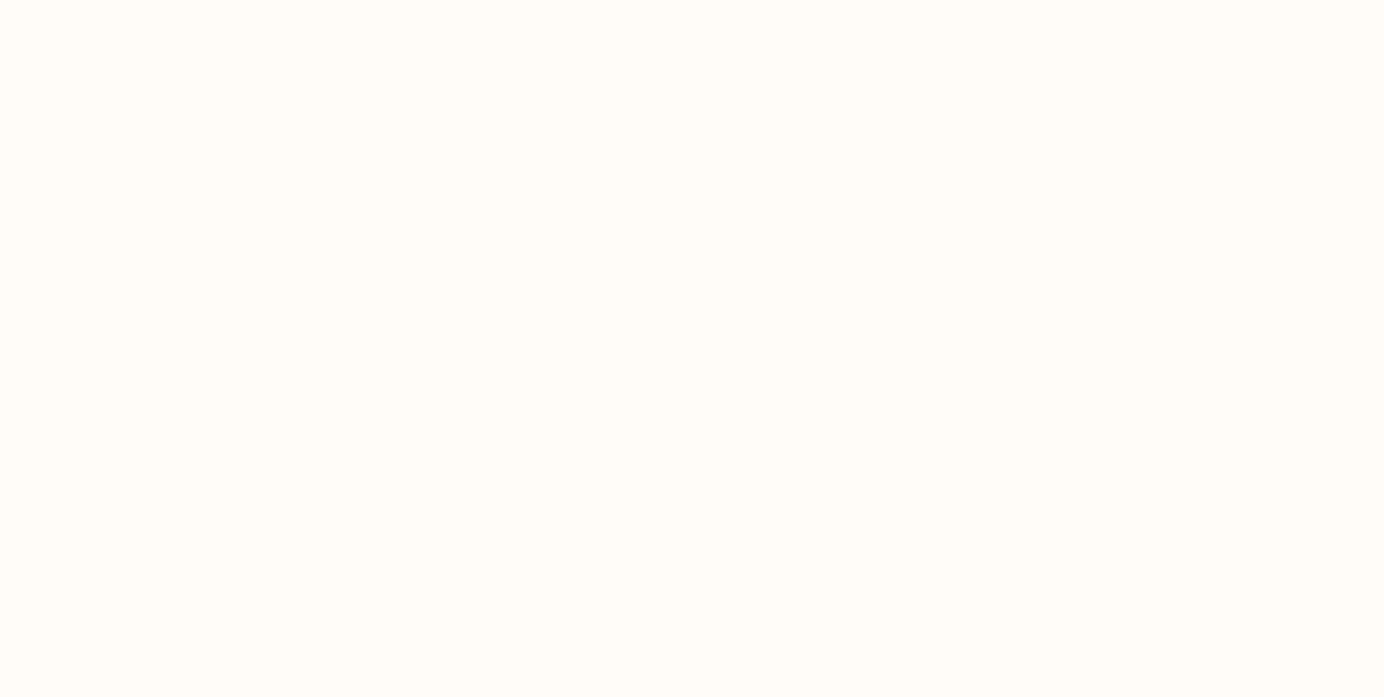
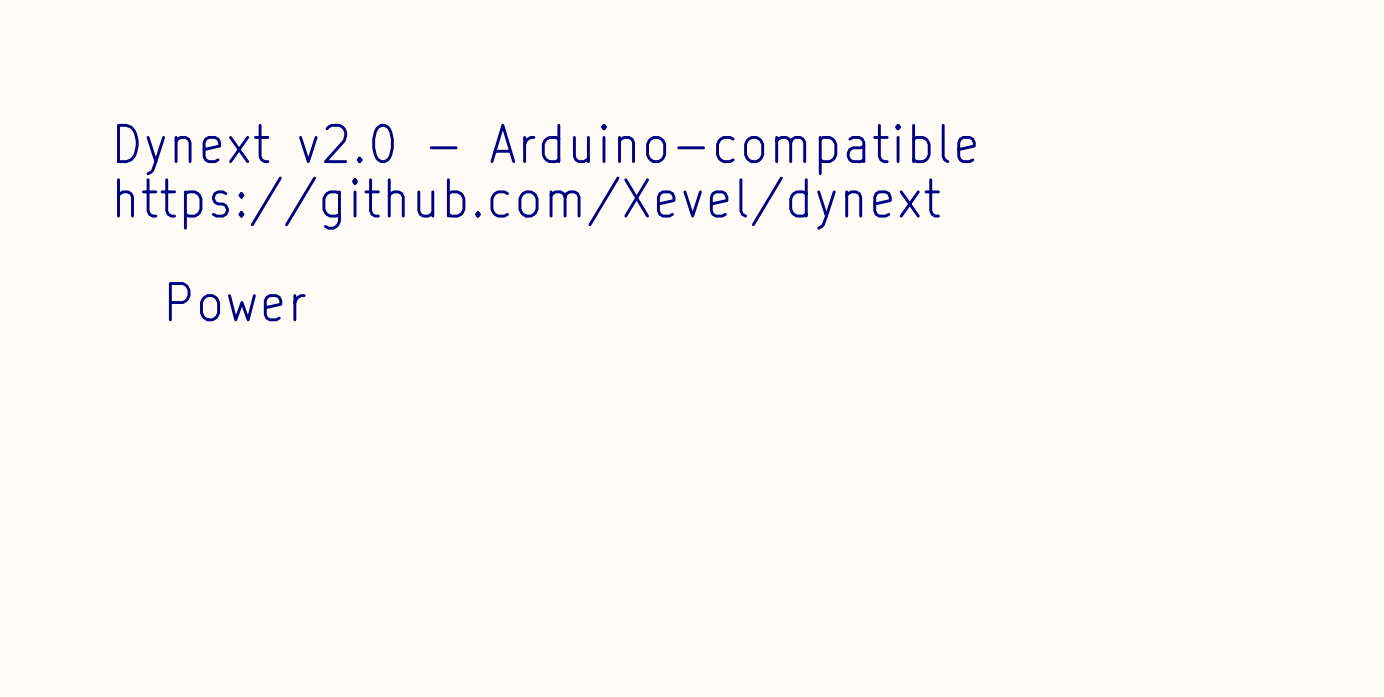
text: none -> Dynext v2.0 - Arduino-compatible (546, 149)
text: none -> https://github.com/Xevel/dynext (528, 203)
text: none -> Power (237, 301)

